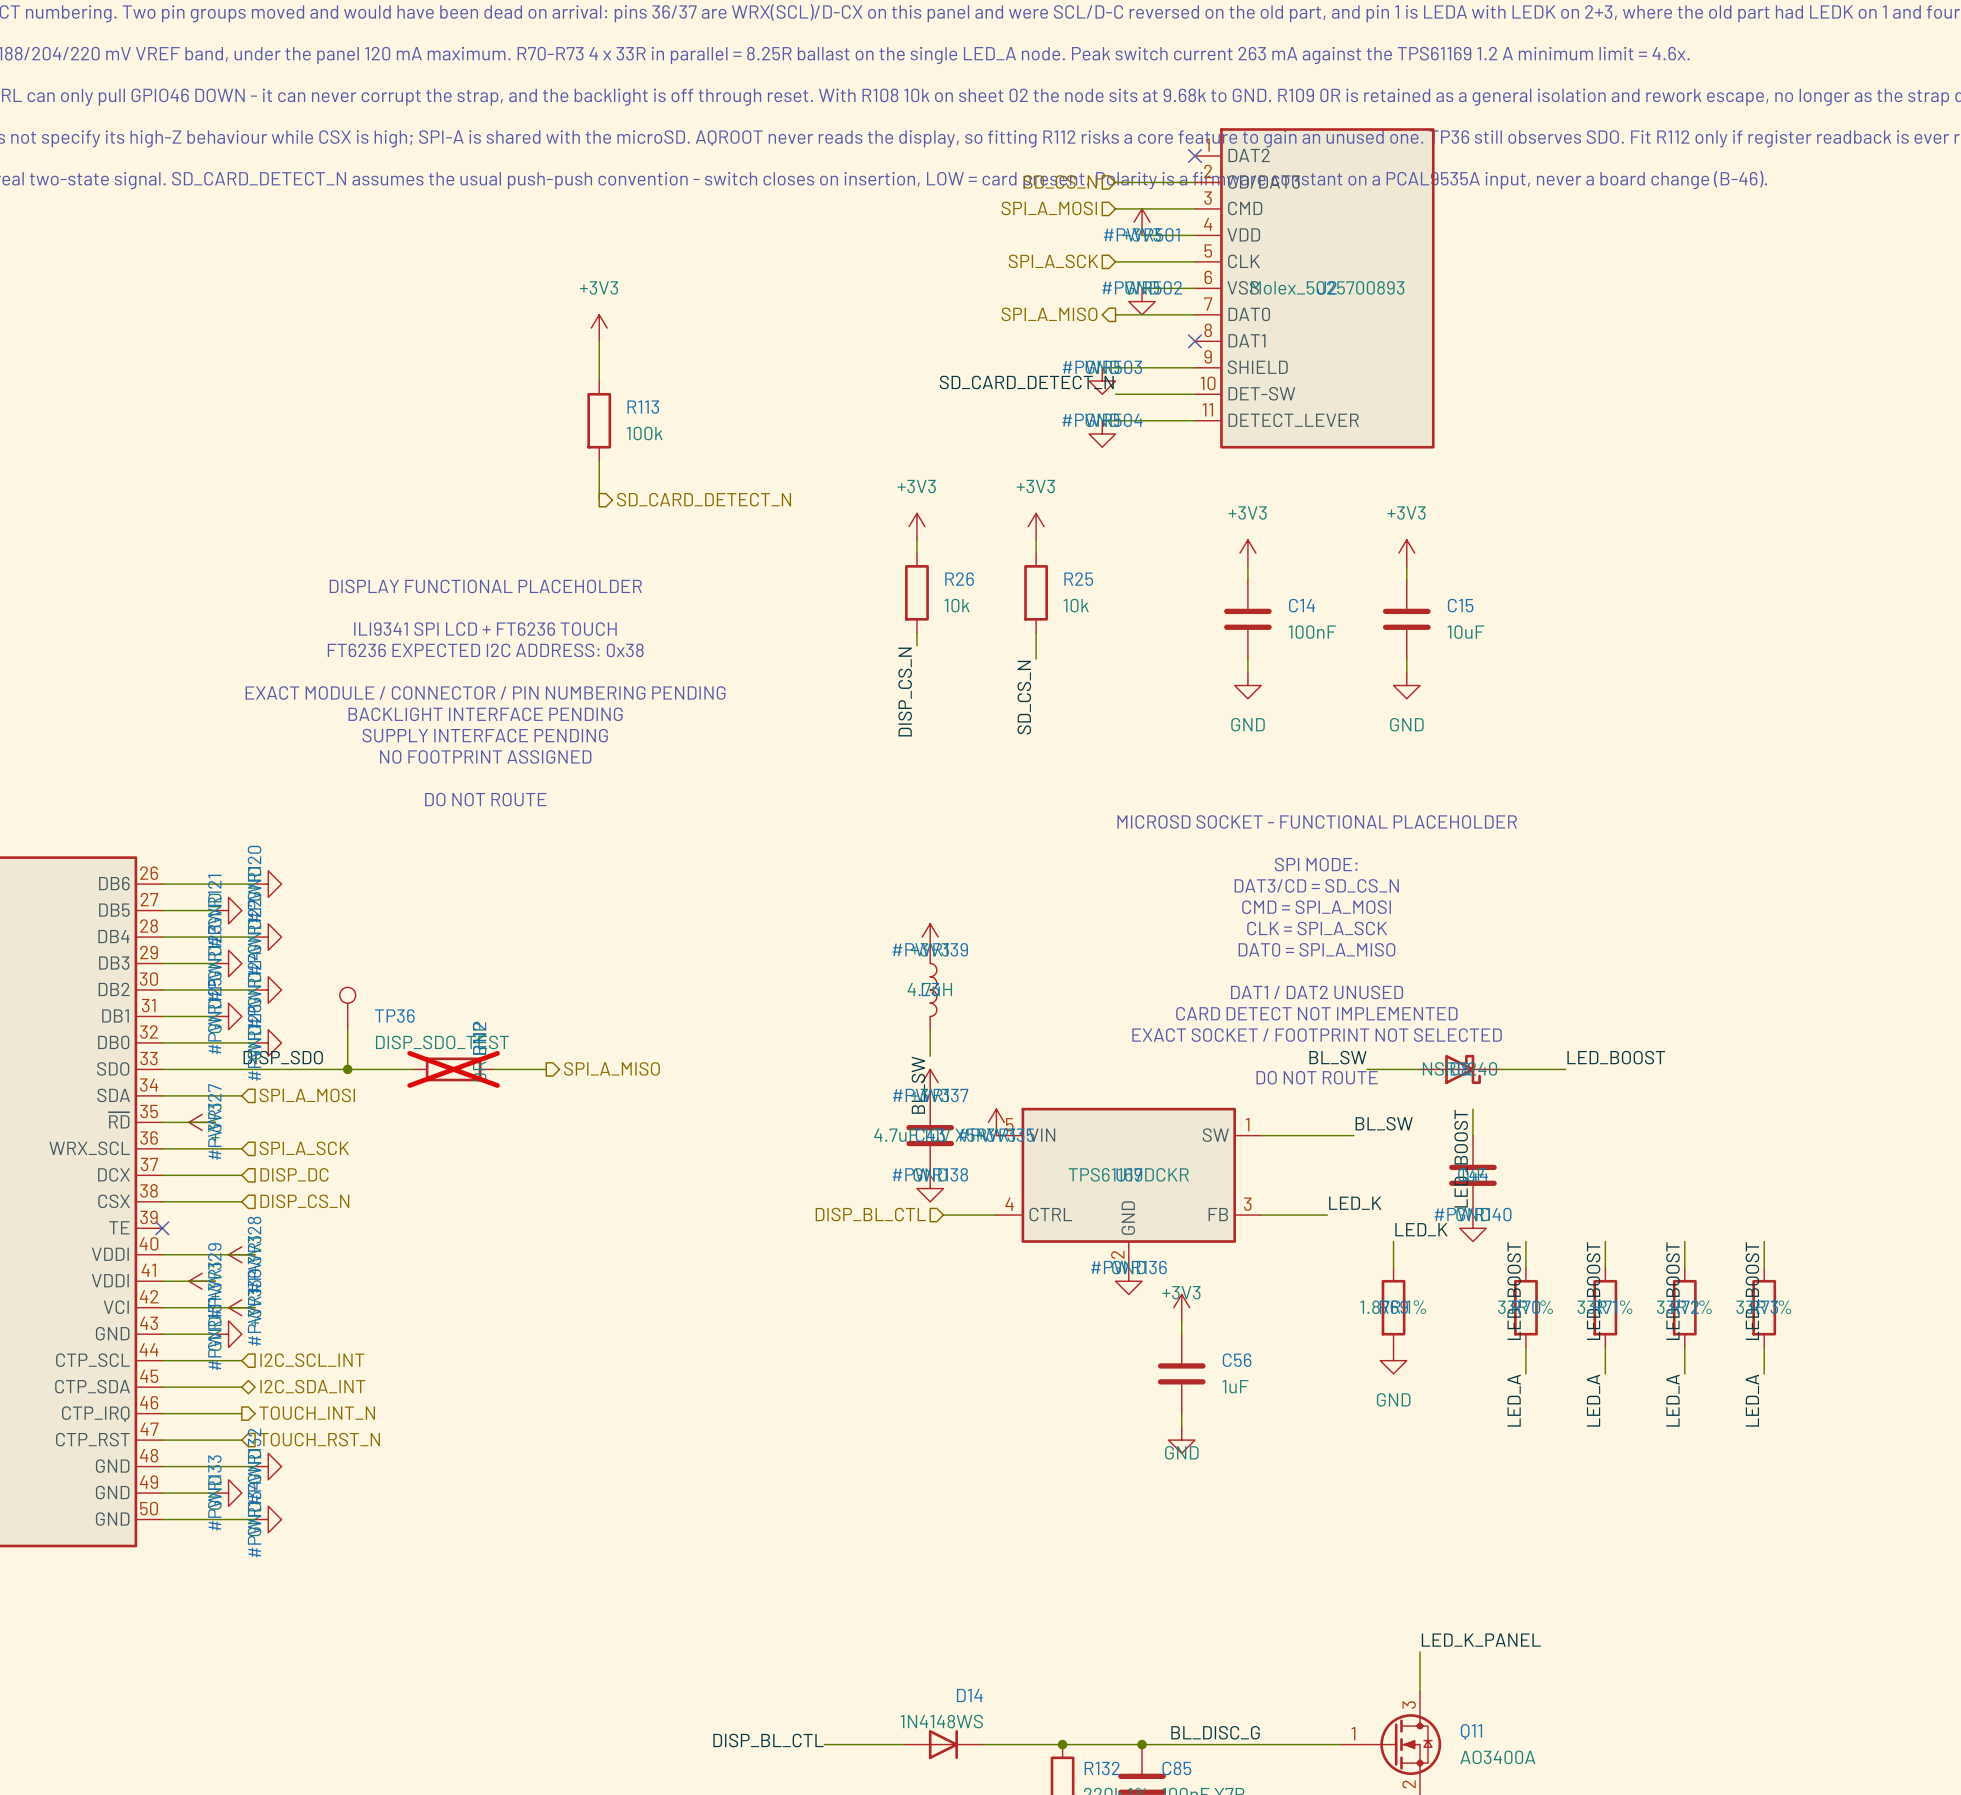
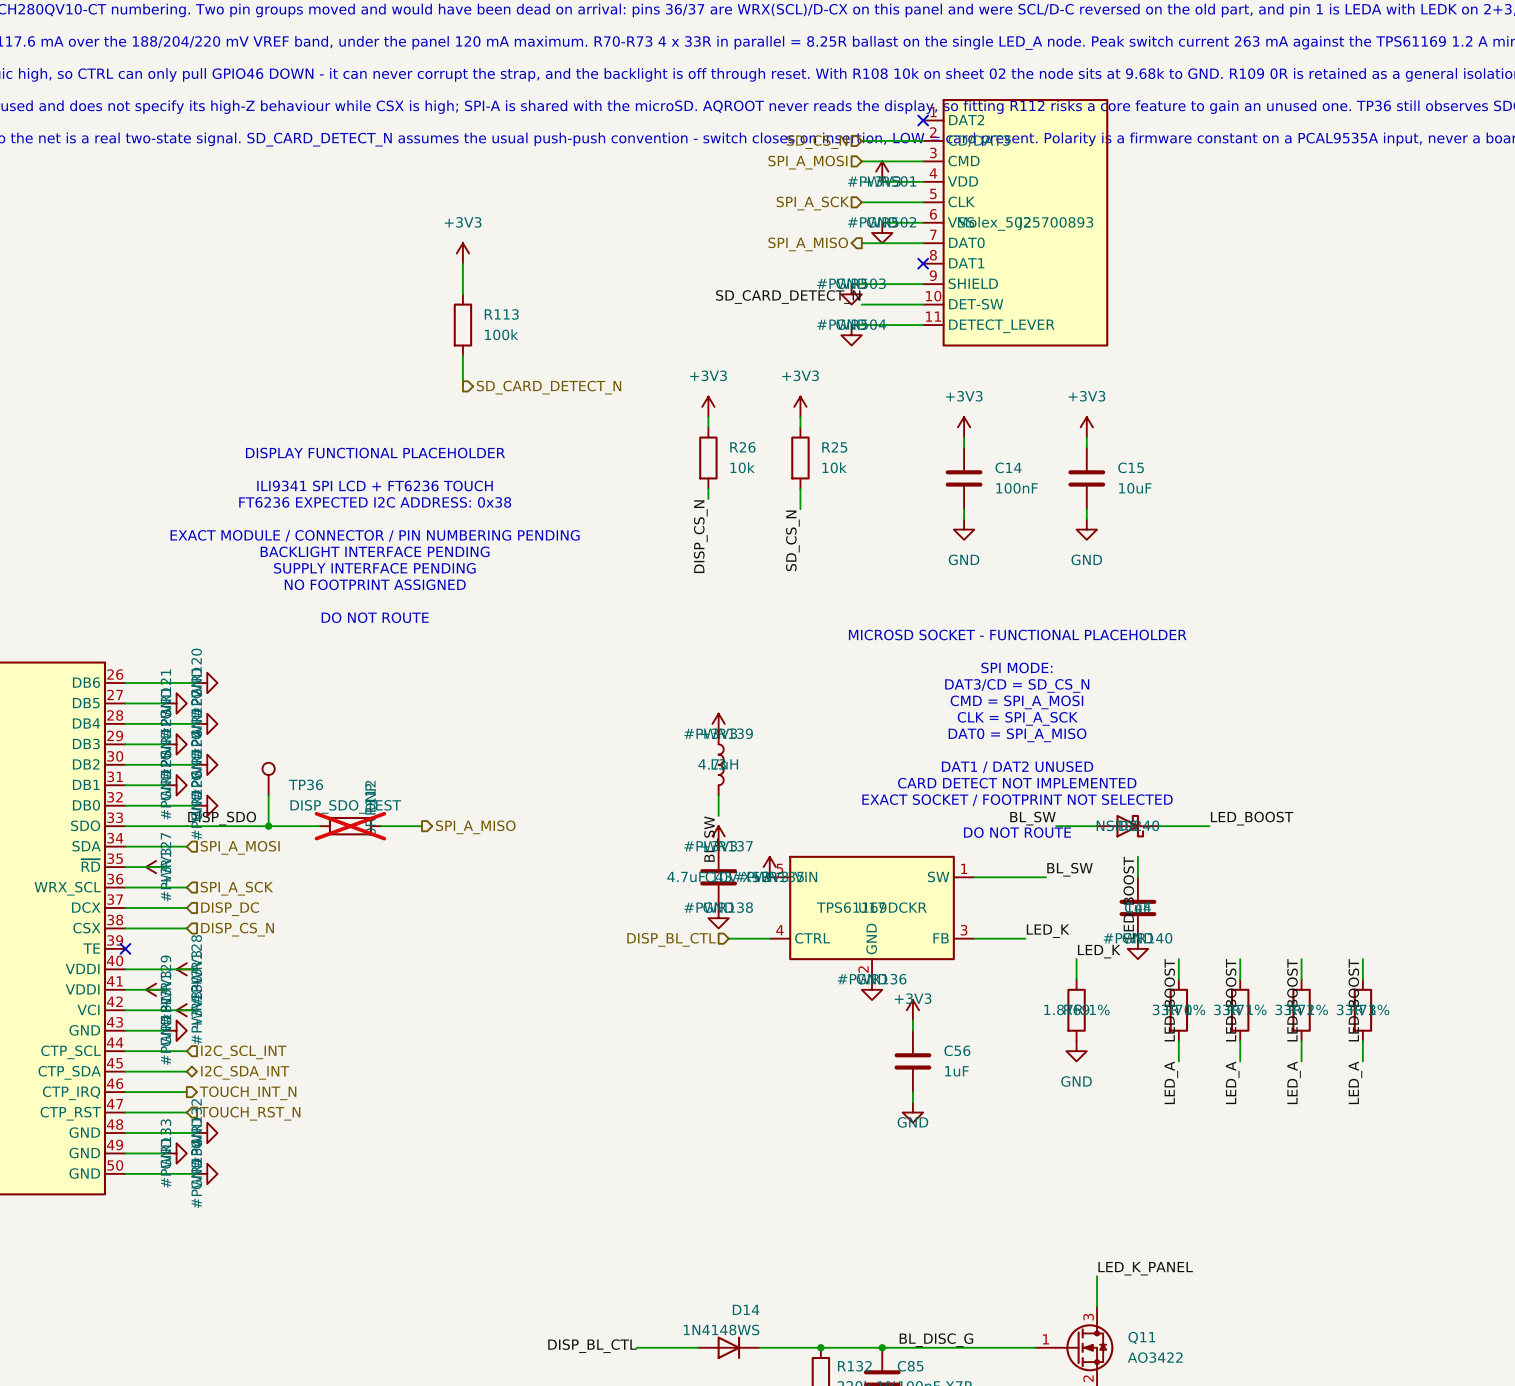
Q11 value: AO3400A (1497, 1757) -> AO3422 (1155, 1357)

